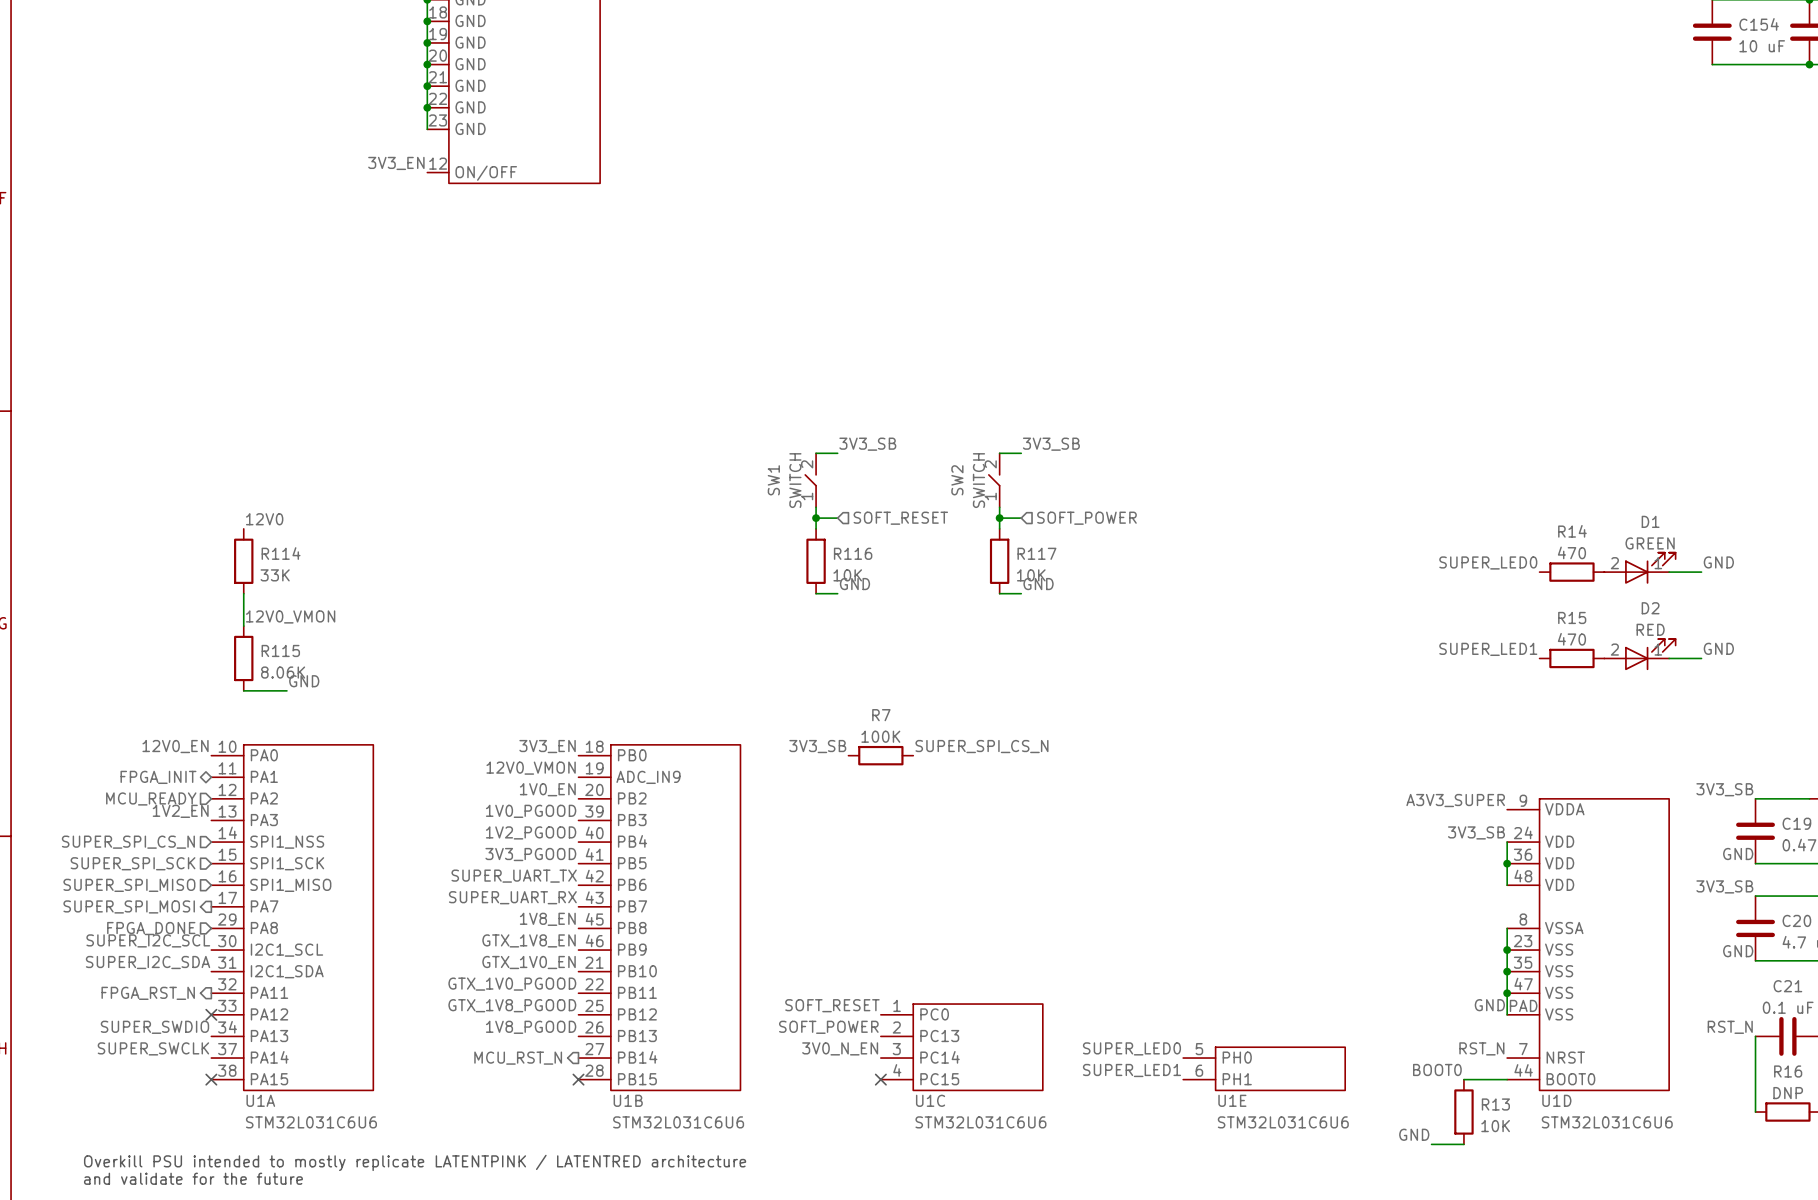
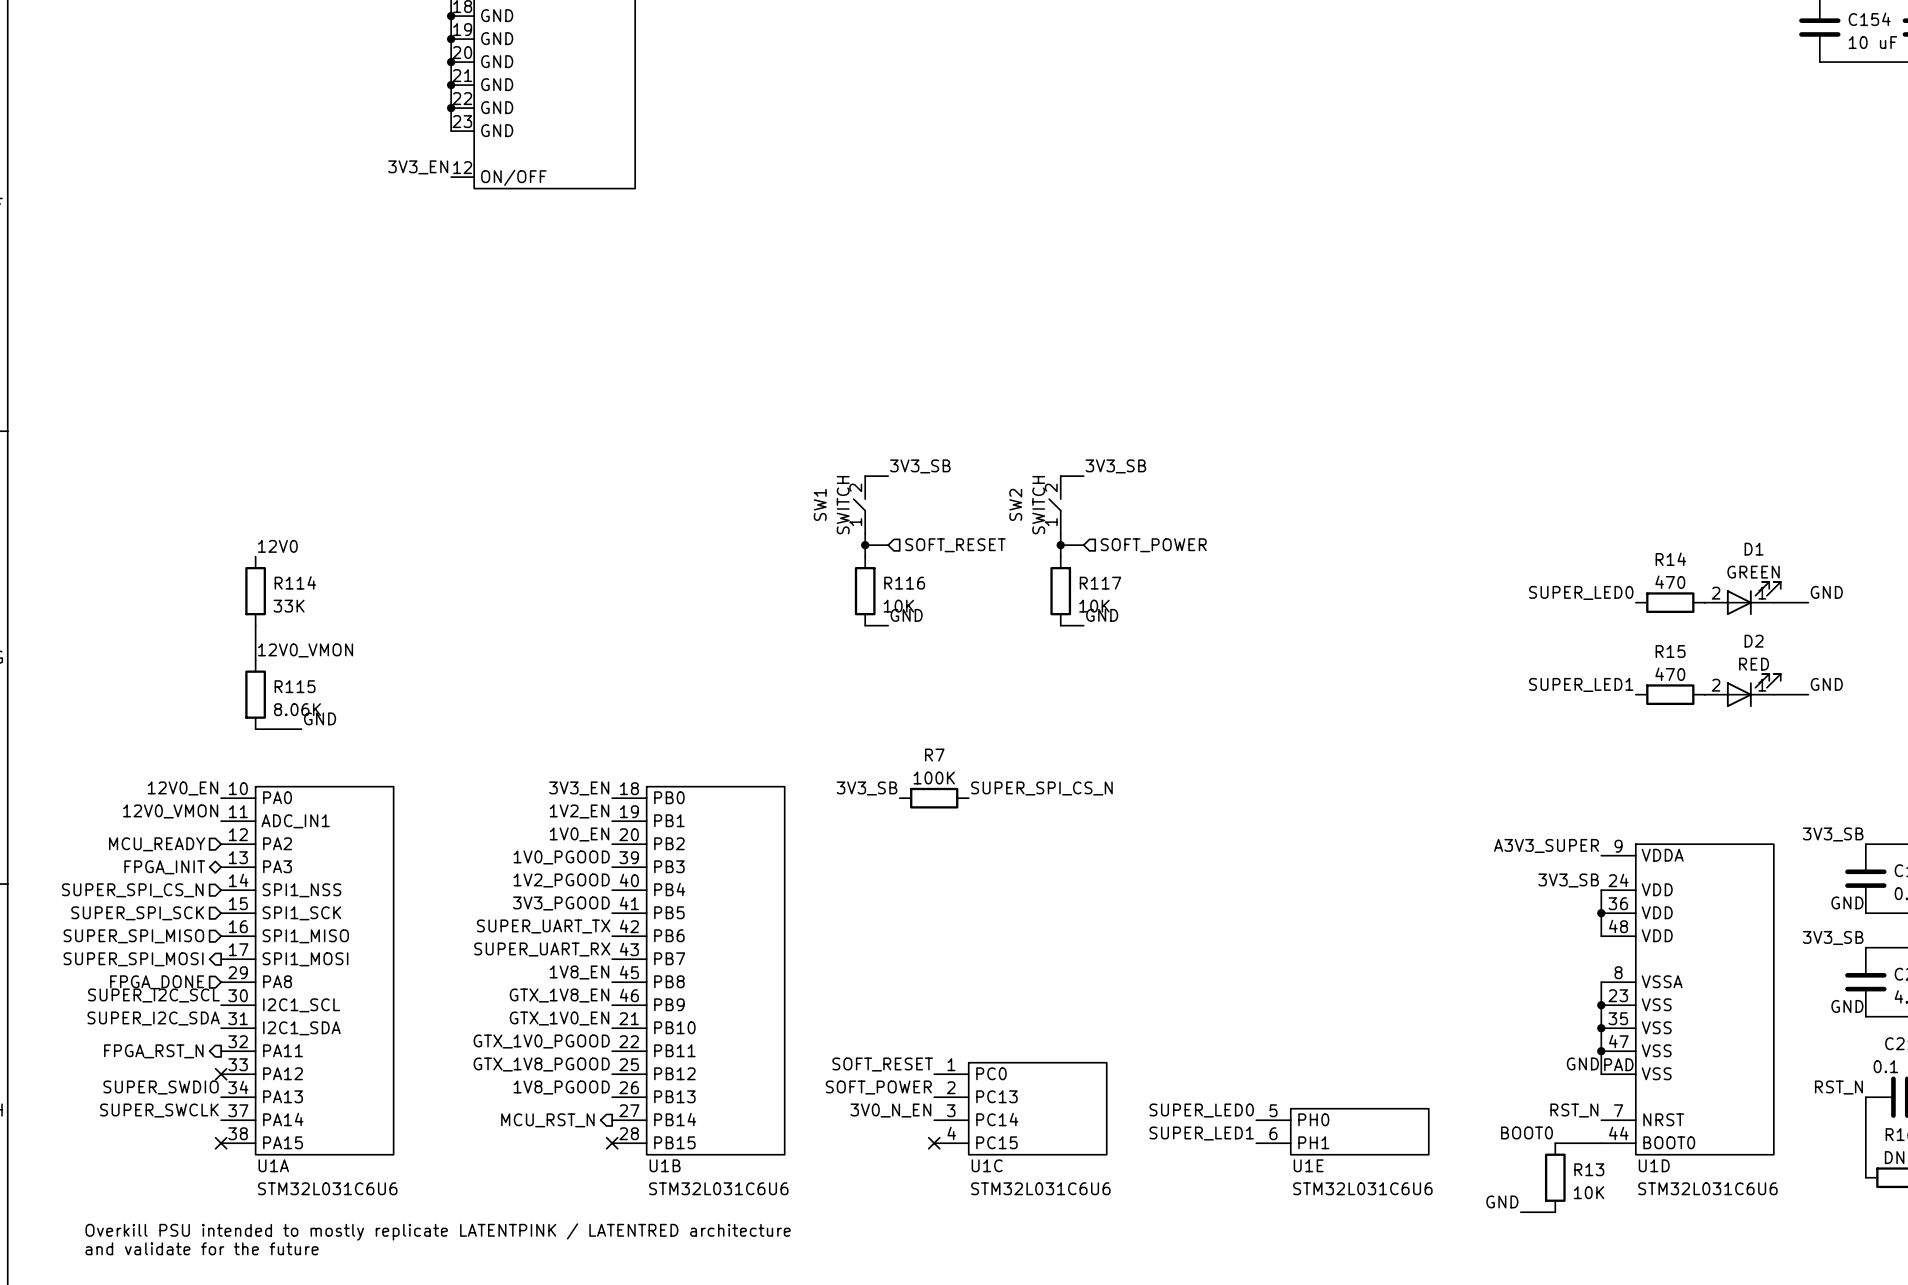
label: none -> 12V0_VMON (170, 811)
label: 12V0_VMON (531, 768) -> 1V2_EN (579, 811)
U1A pin name: PA1 (264, 776) -> ADC_IN1 (295, 821)
hierarchical label position: FPGA_INIT (158, 777) -> FPGA_INIT (164, 867)
U1B pin name: ADC_IN9 (648, 777) -> PB1 (669, 820)
label: 1V2_EN (180, 811) -> none
U1A pin name: PA7 (264, 906) -> SPI1_MOSI (305, 959)

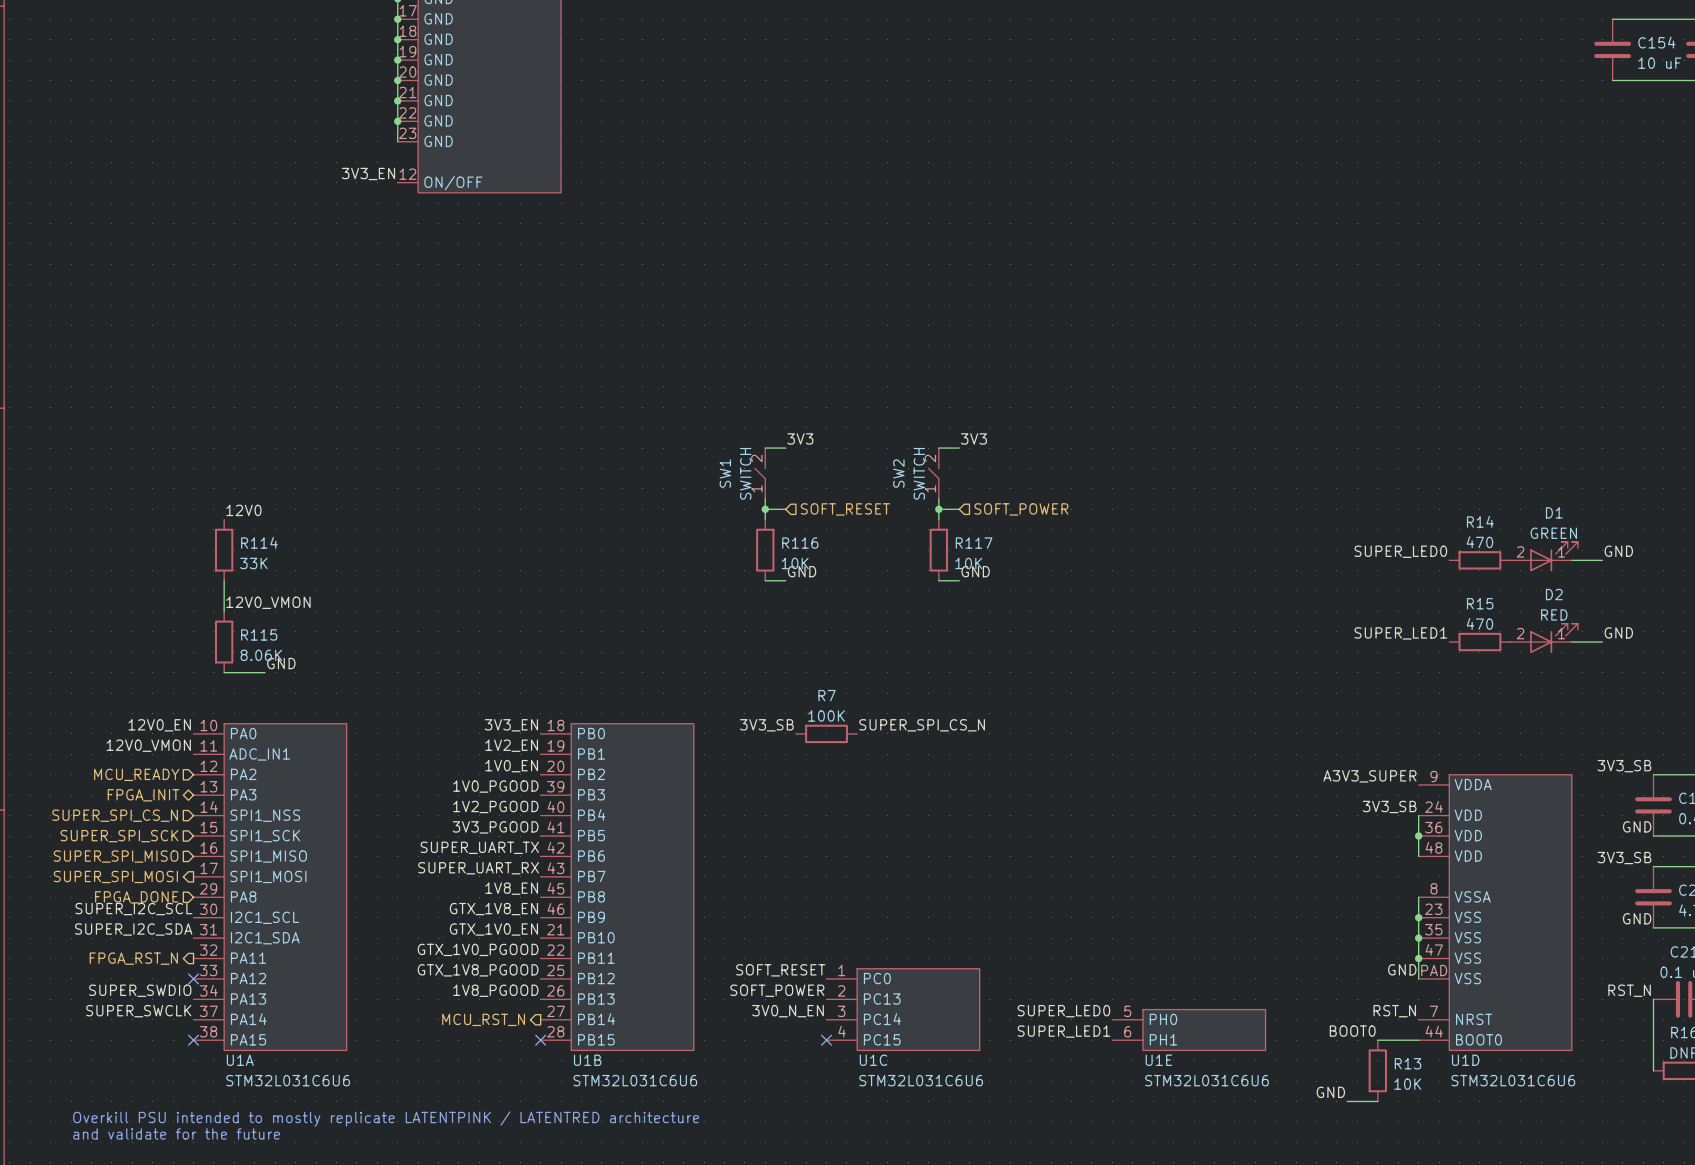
label: 3V3_SB (920, 466) -> 3V3 (800, 438)
label: 3V3_SB (1115, 466) -> 3V3 (973, 438)

